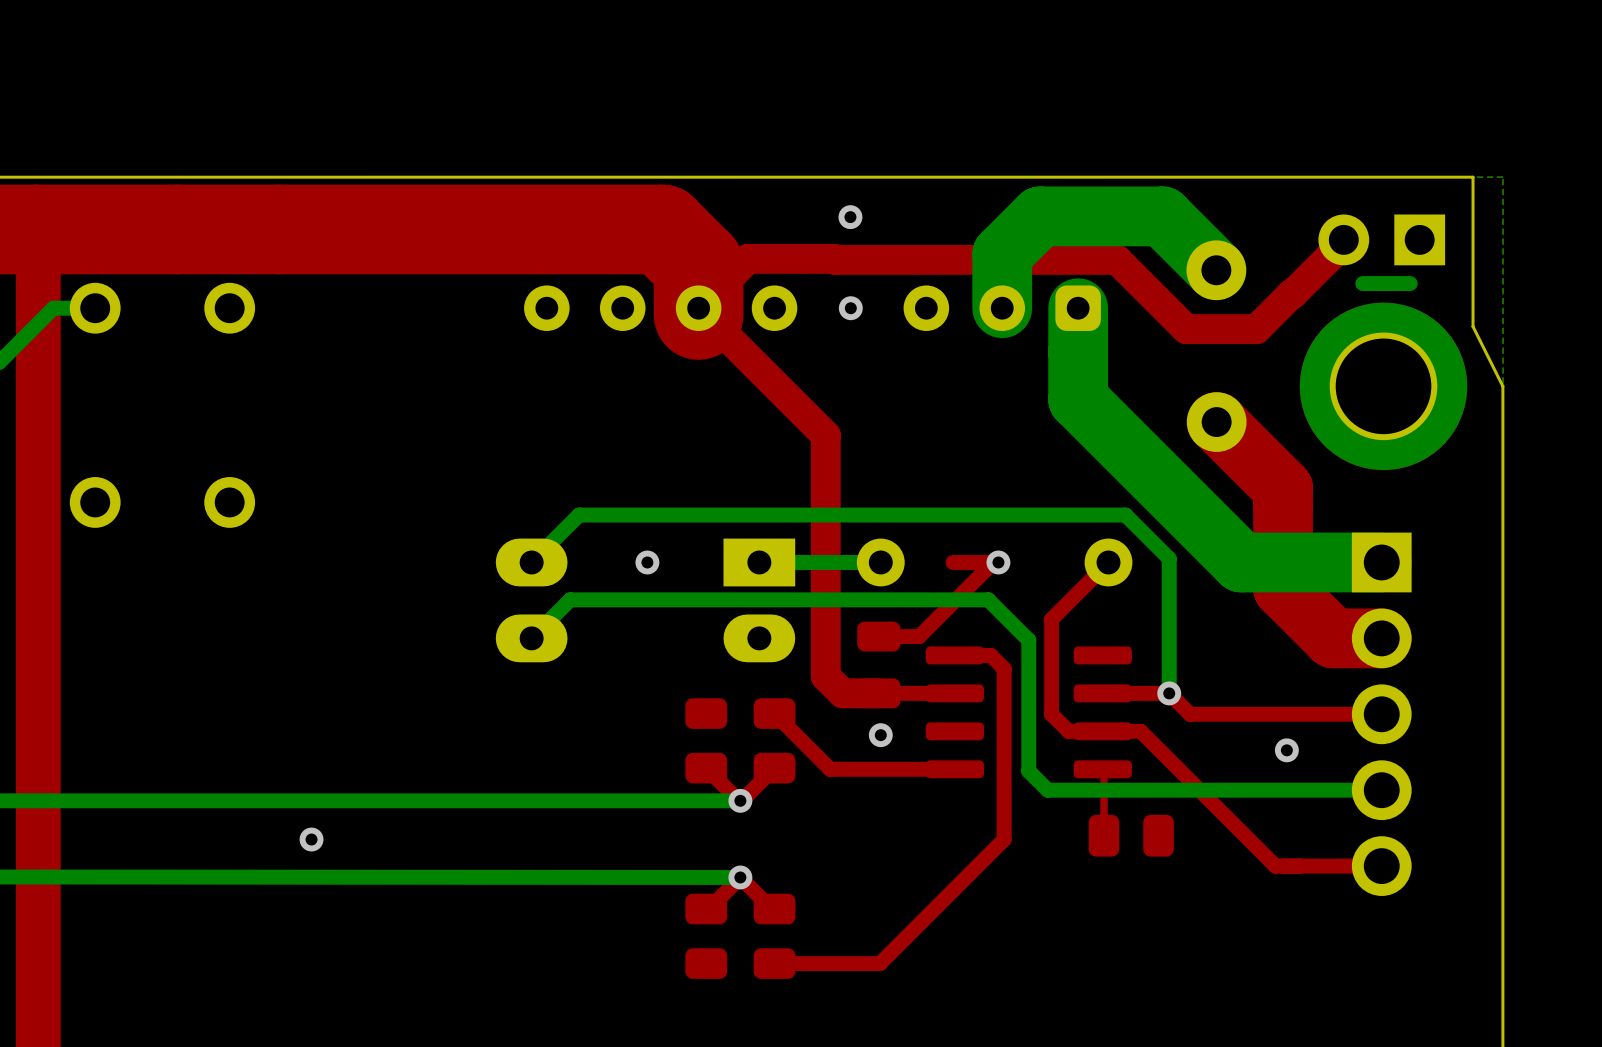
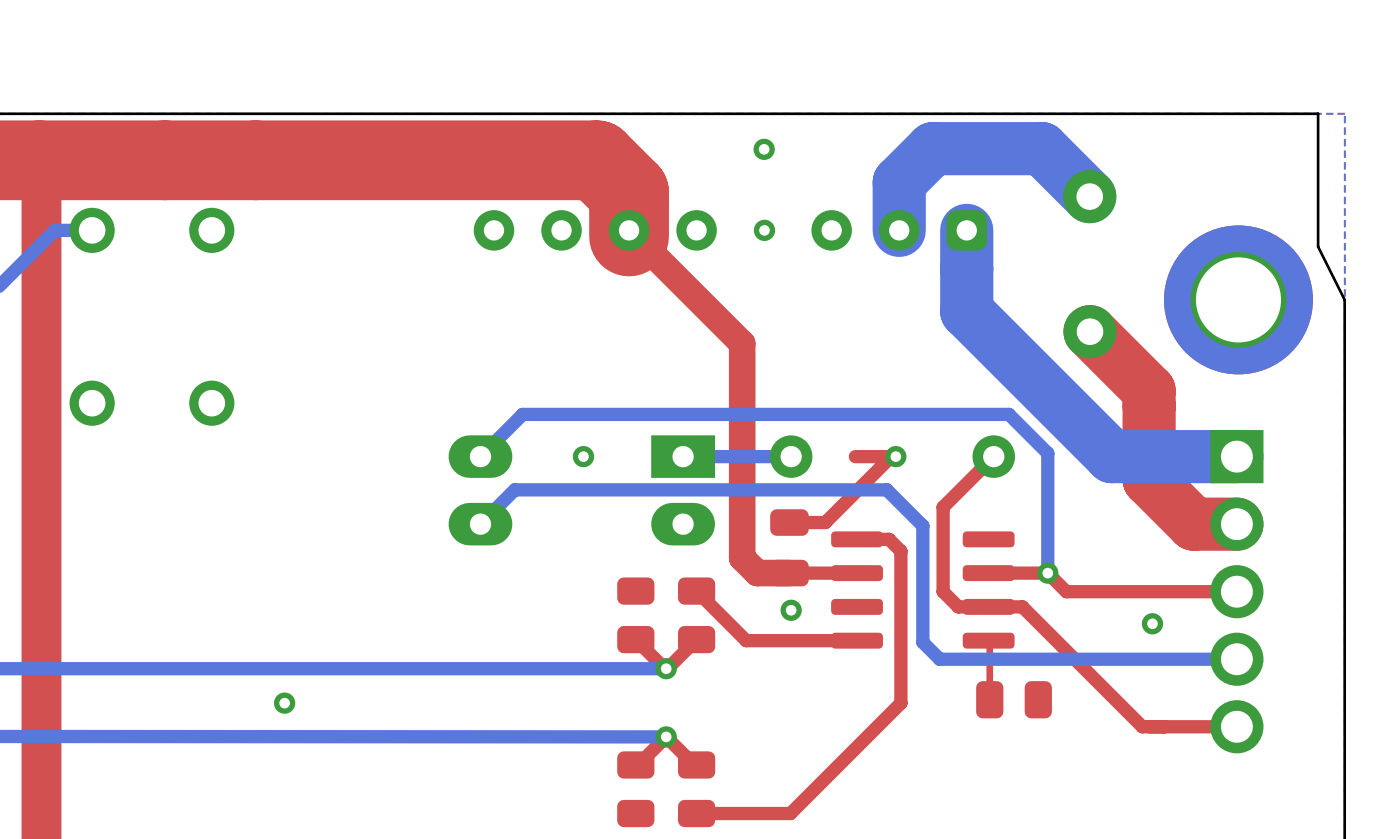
top track: (1347, 239) (1256, 329) (1186, 329) (1117, 259) (747, 258) (698, 308) -> none
part: (1381, 239) -> none
bottom track: (1410, 283) (1362, 283) -> none

